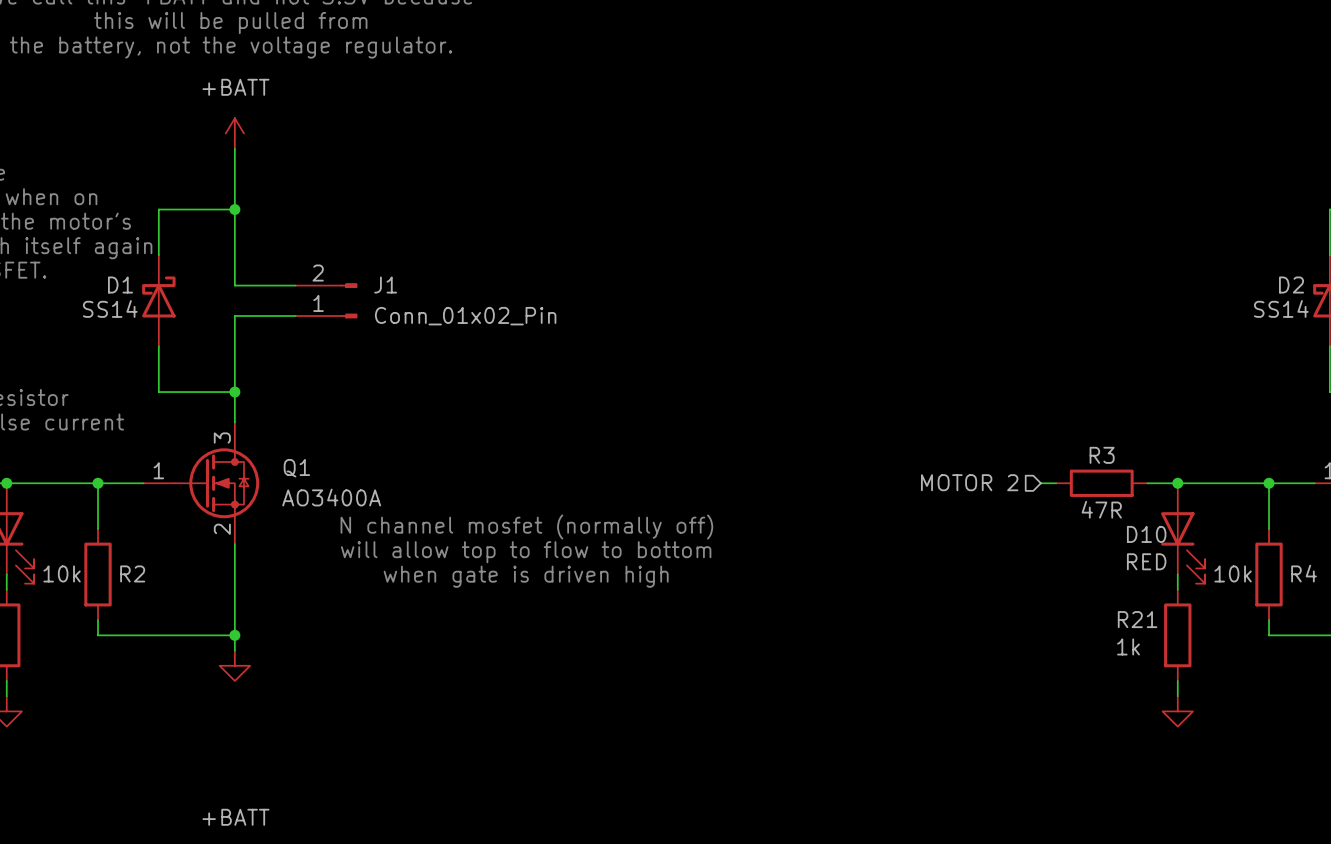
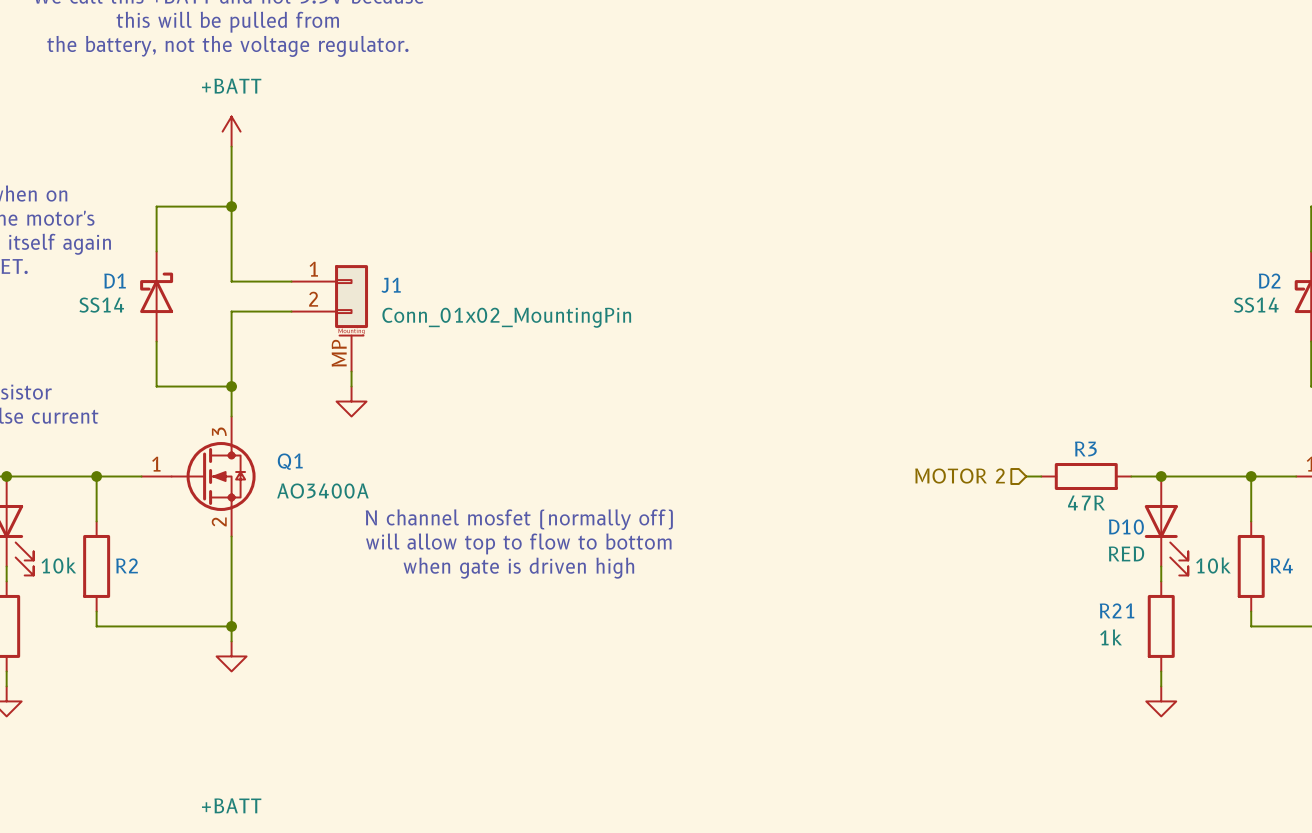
J1 symbol: [295, 283, 358, 319] -> [291, 265, 369, 372]
J1 value: Conn_01x02_Pin (465, 316) -> Conn_01x02_MountingPin (506, 317)
wire: none -> (351, 371) (351, 386)
power symbol: none -> (351, 401)

